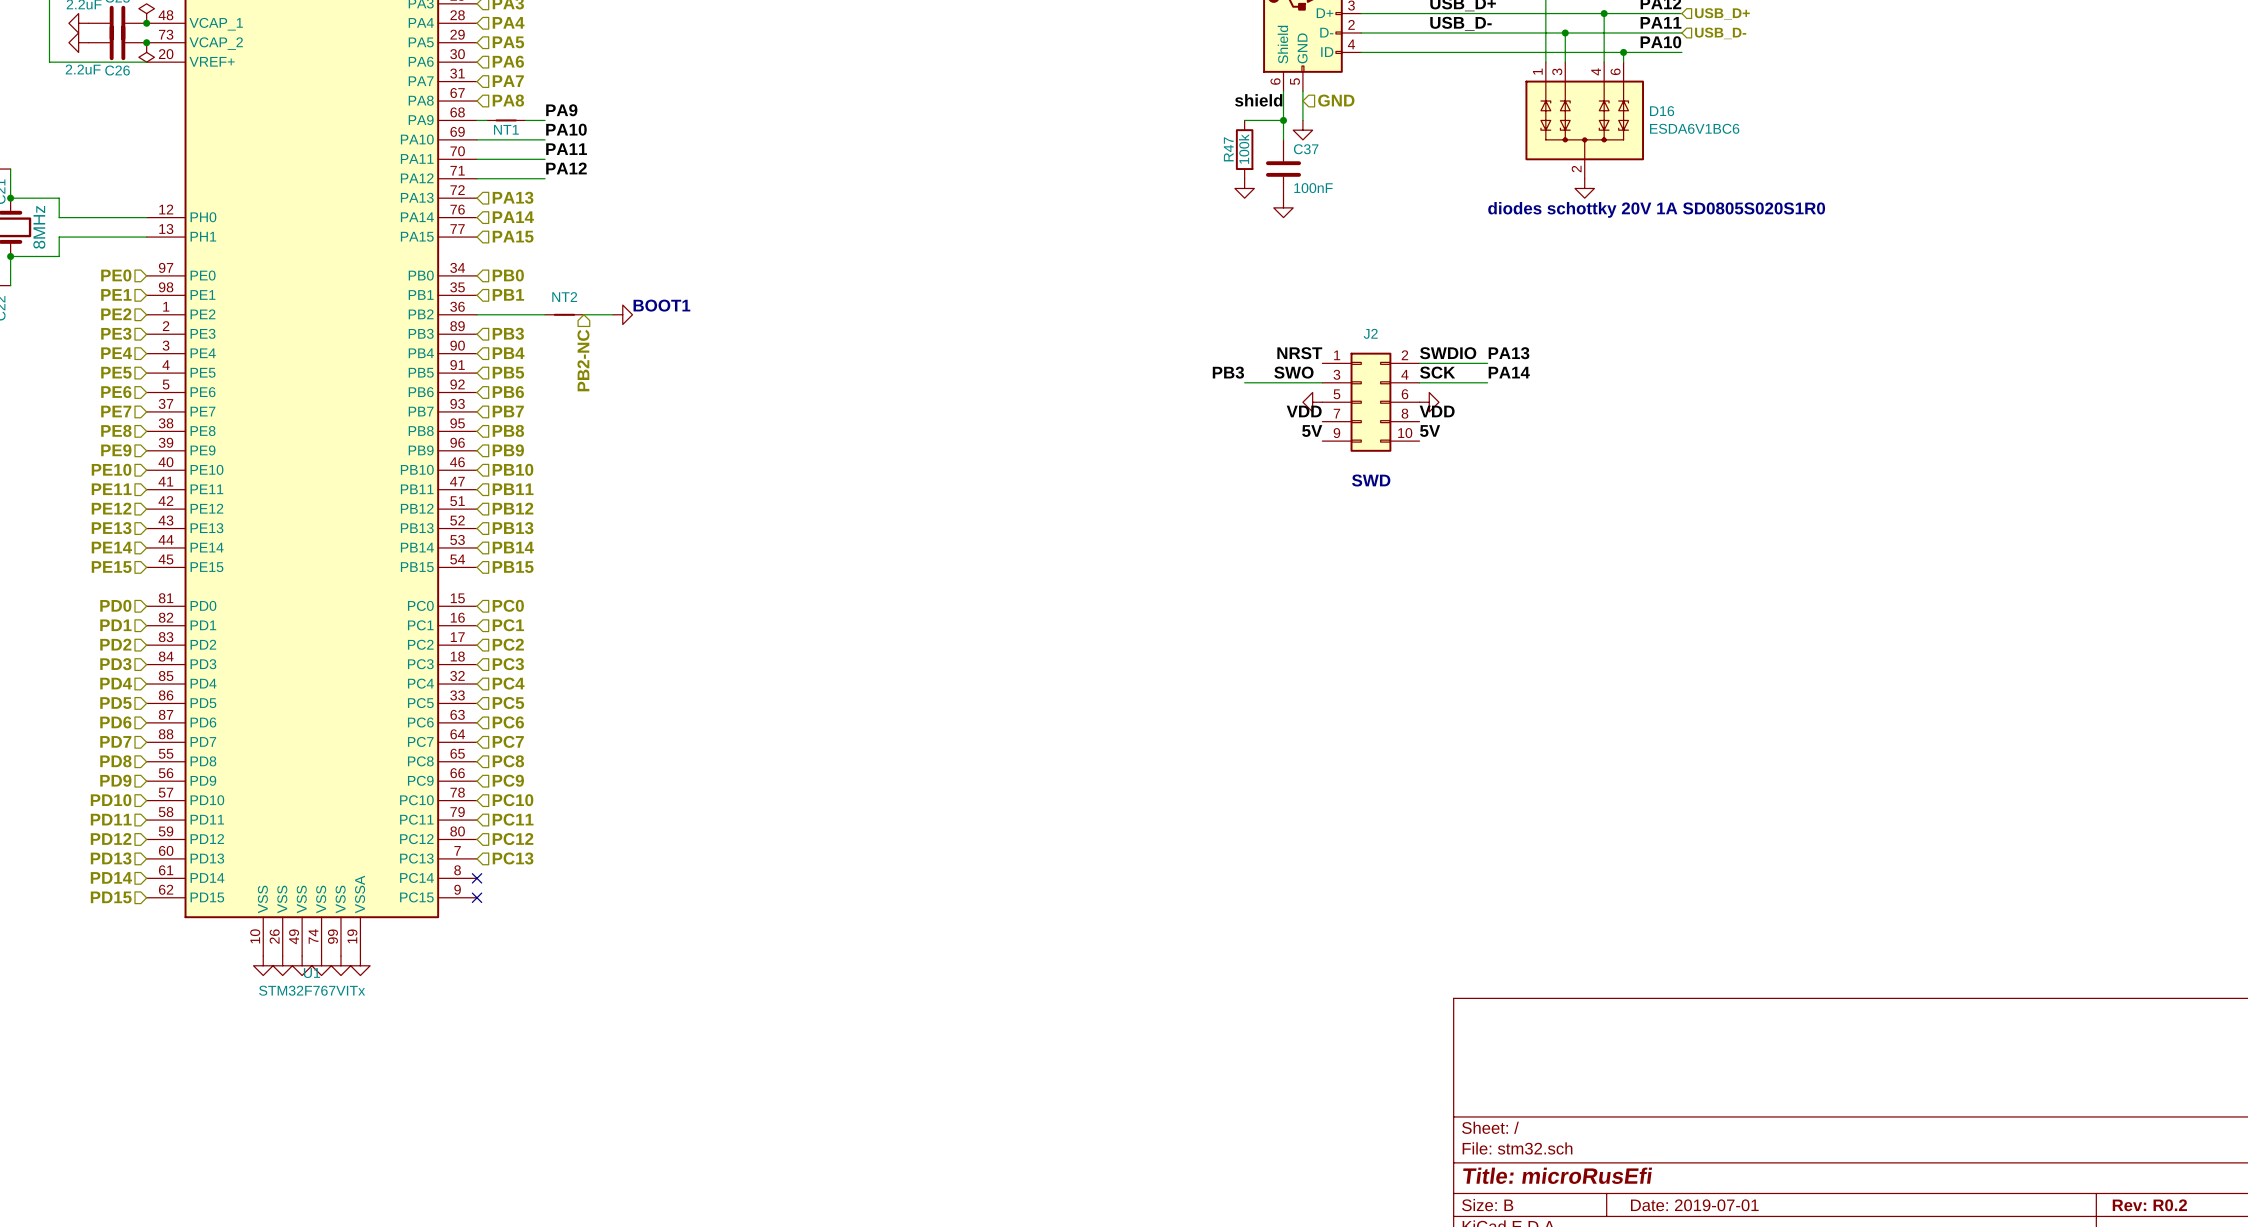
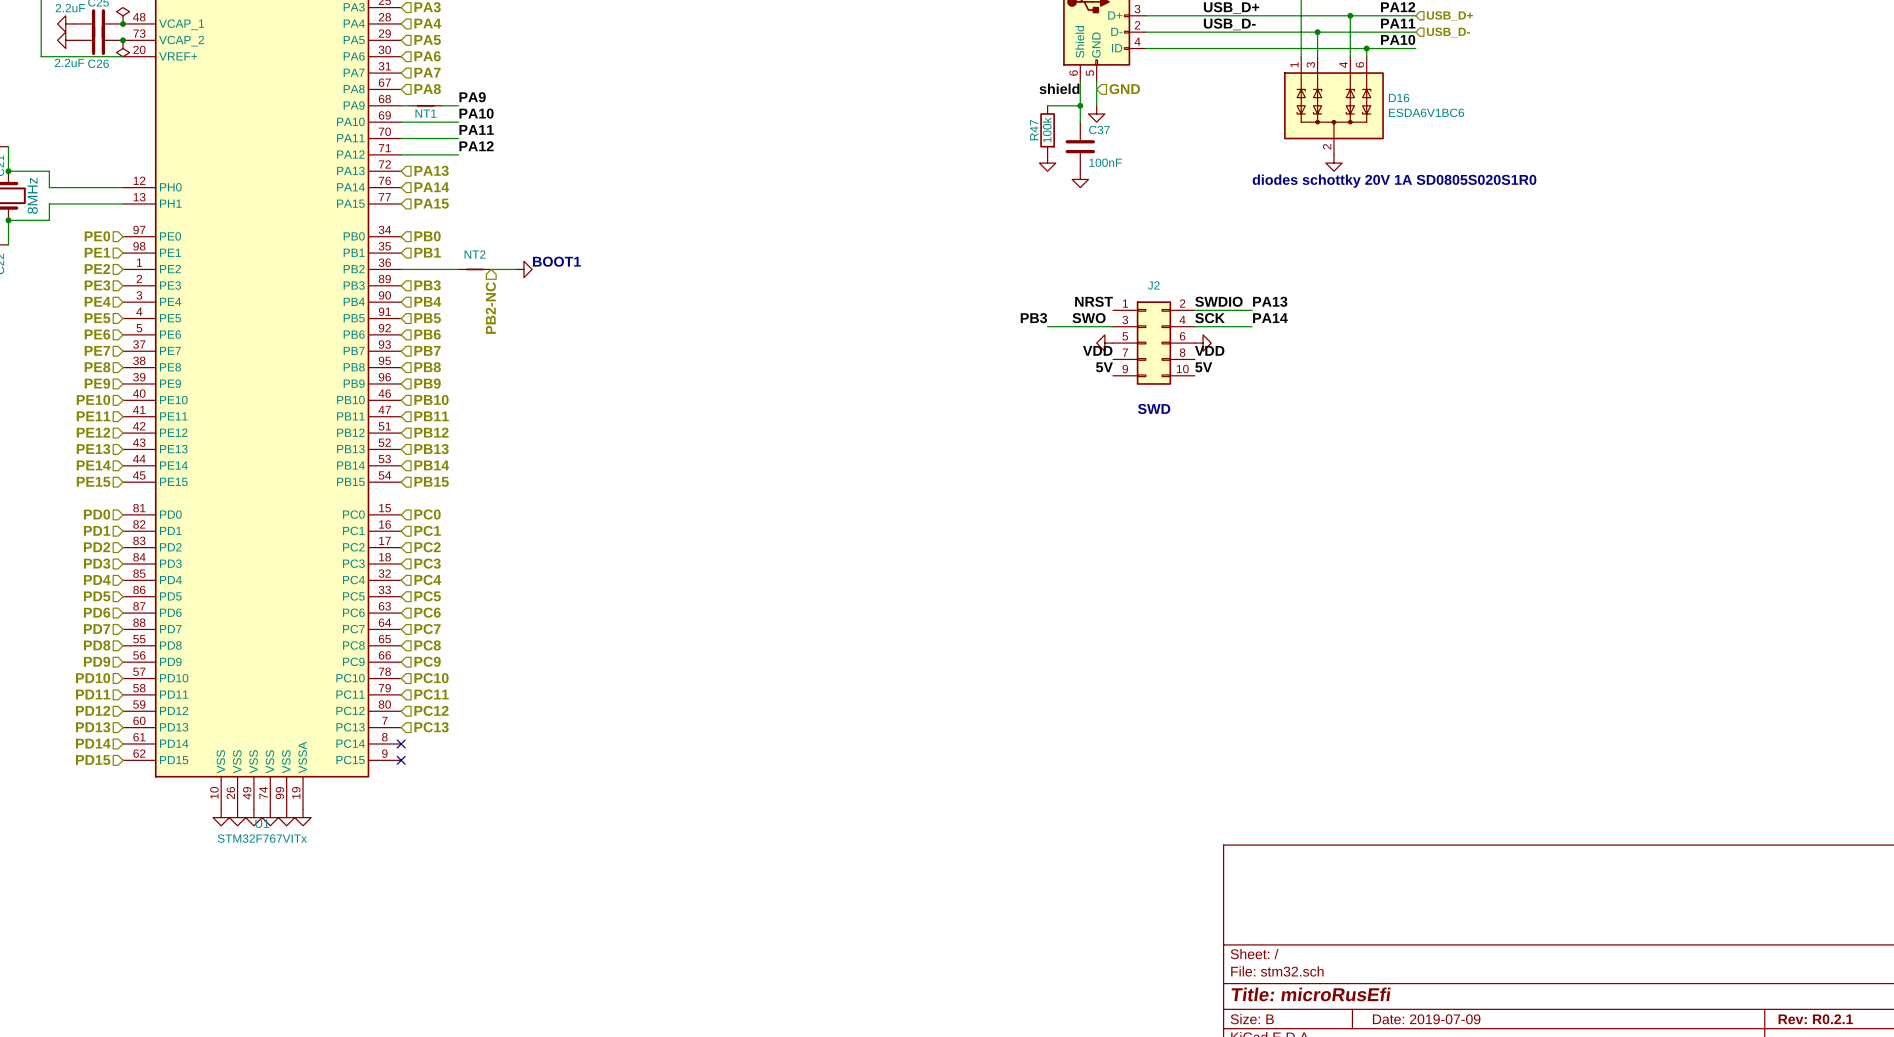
title block: Date: 2019-07-01 (1694, 1205) -> Date: 2019-07-09 (1426, 1019)
title block: Rev: R0.2 (2149, 1205) -> Rev: R0.2.1 (1815, 1019)

